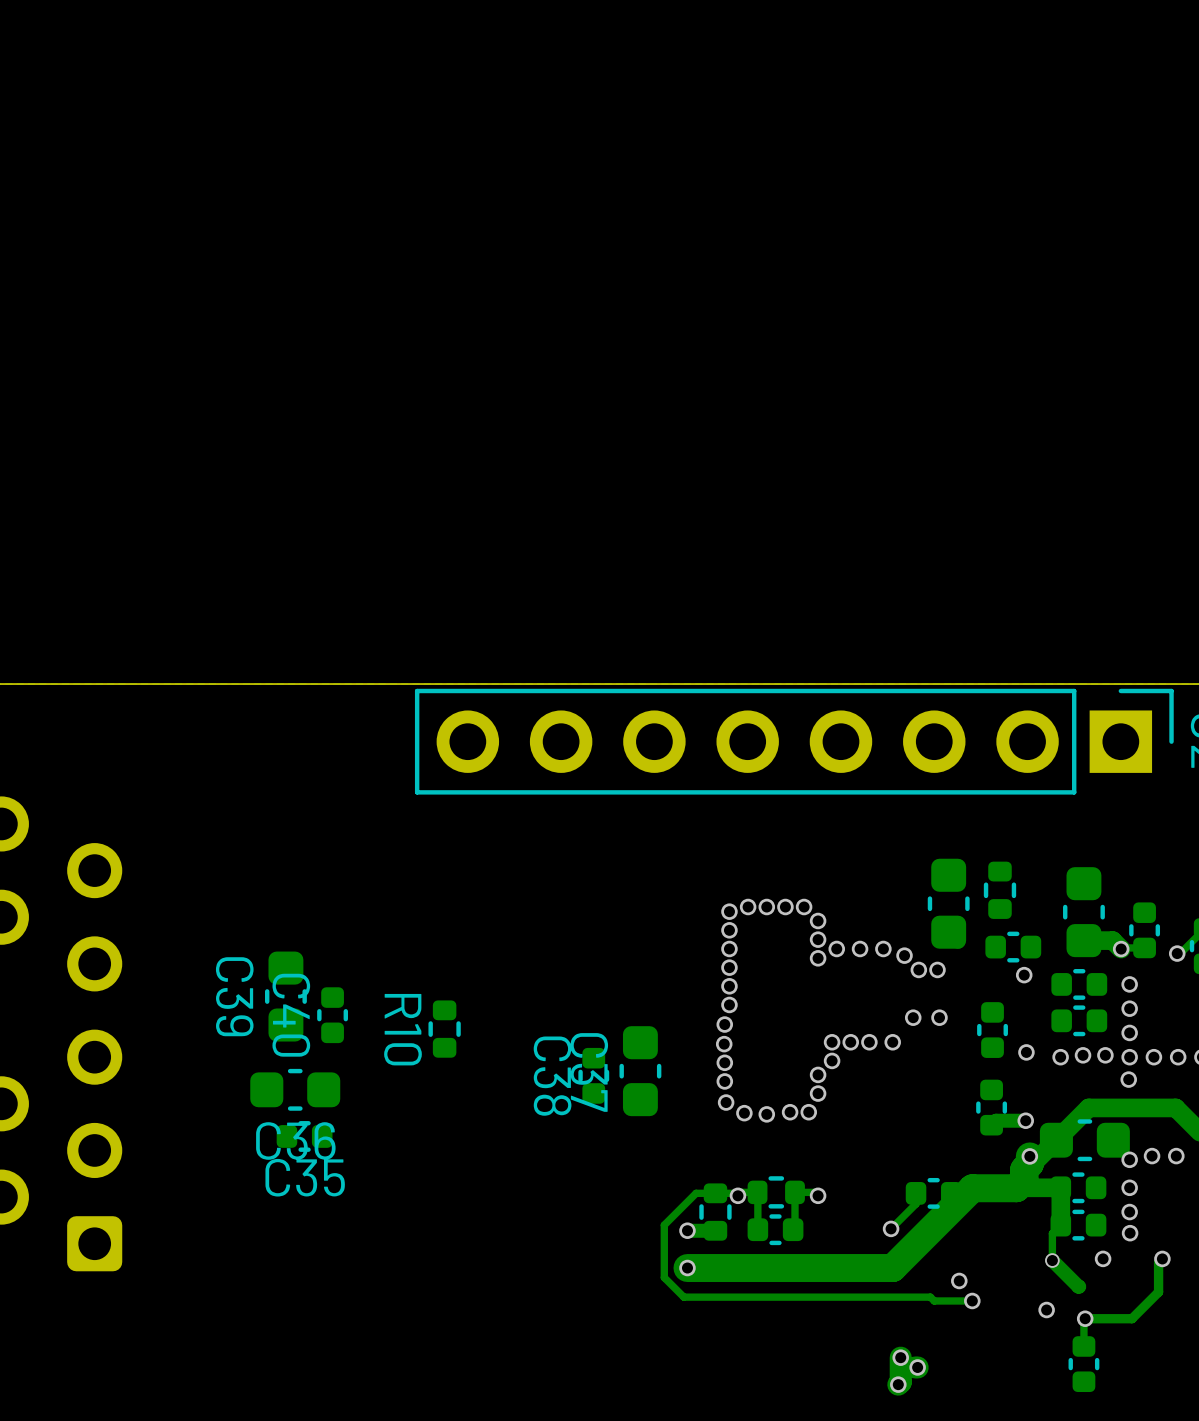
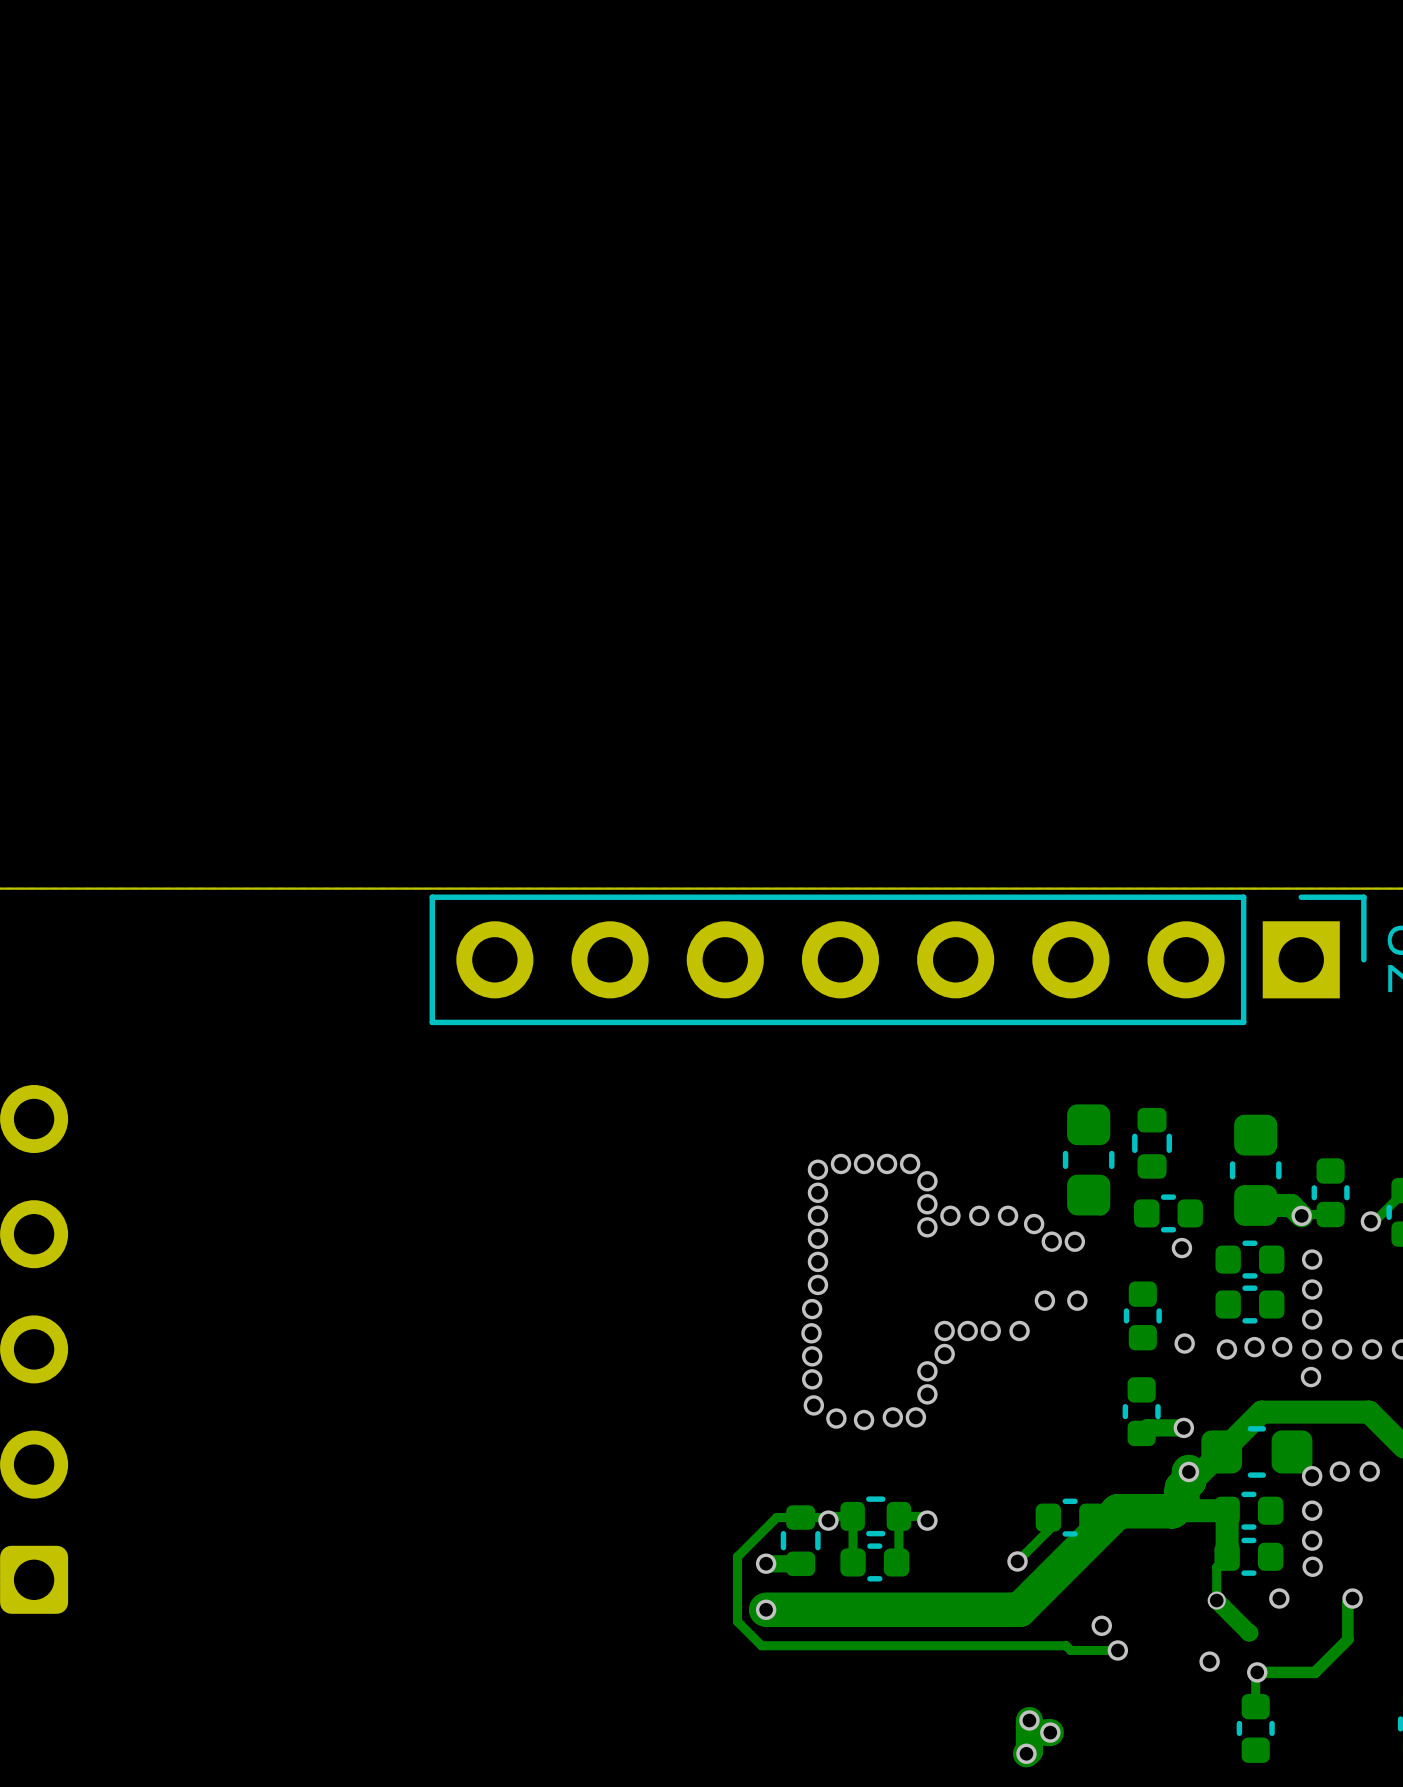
C39: (285, 996) -> none
C40: (332, 1015) -> none
R10: (444, 1029) -> none
C37: (640, 1071) -> none
C38: (593, 1075) -> none
C36: (295, 1089) -> none
C35: (304, 1136) -> none

